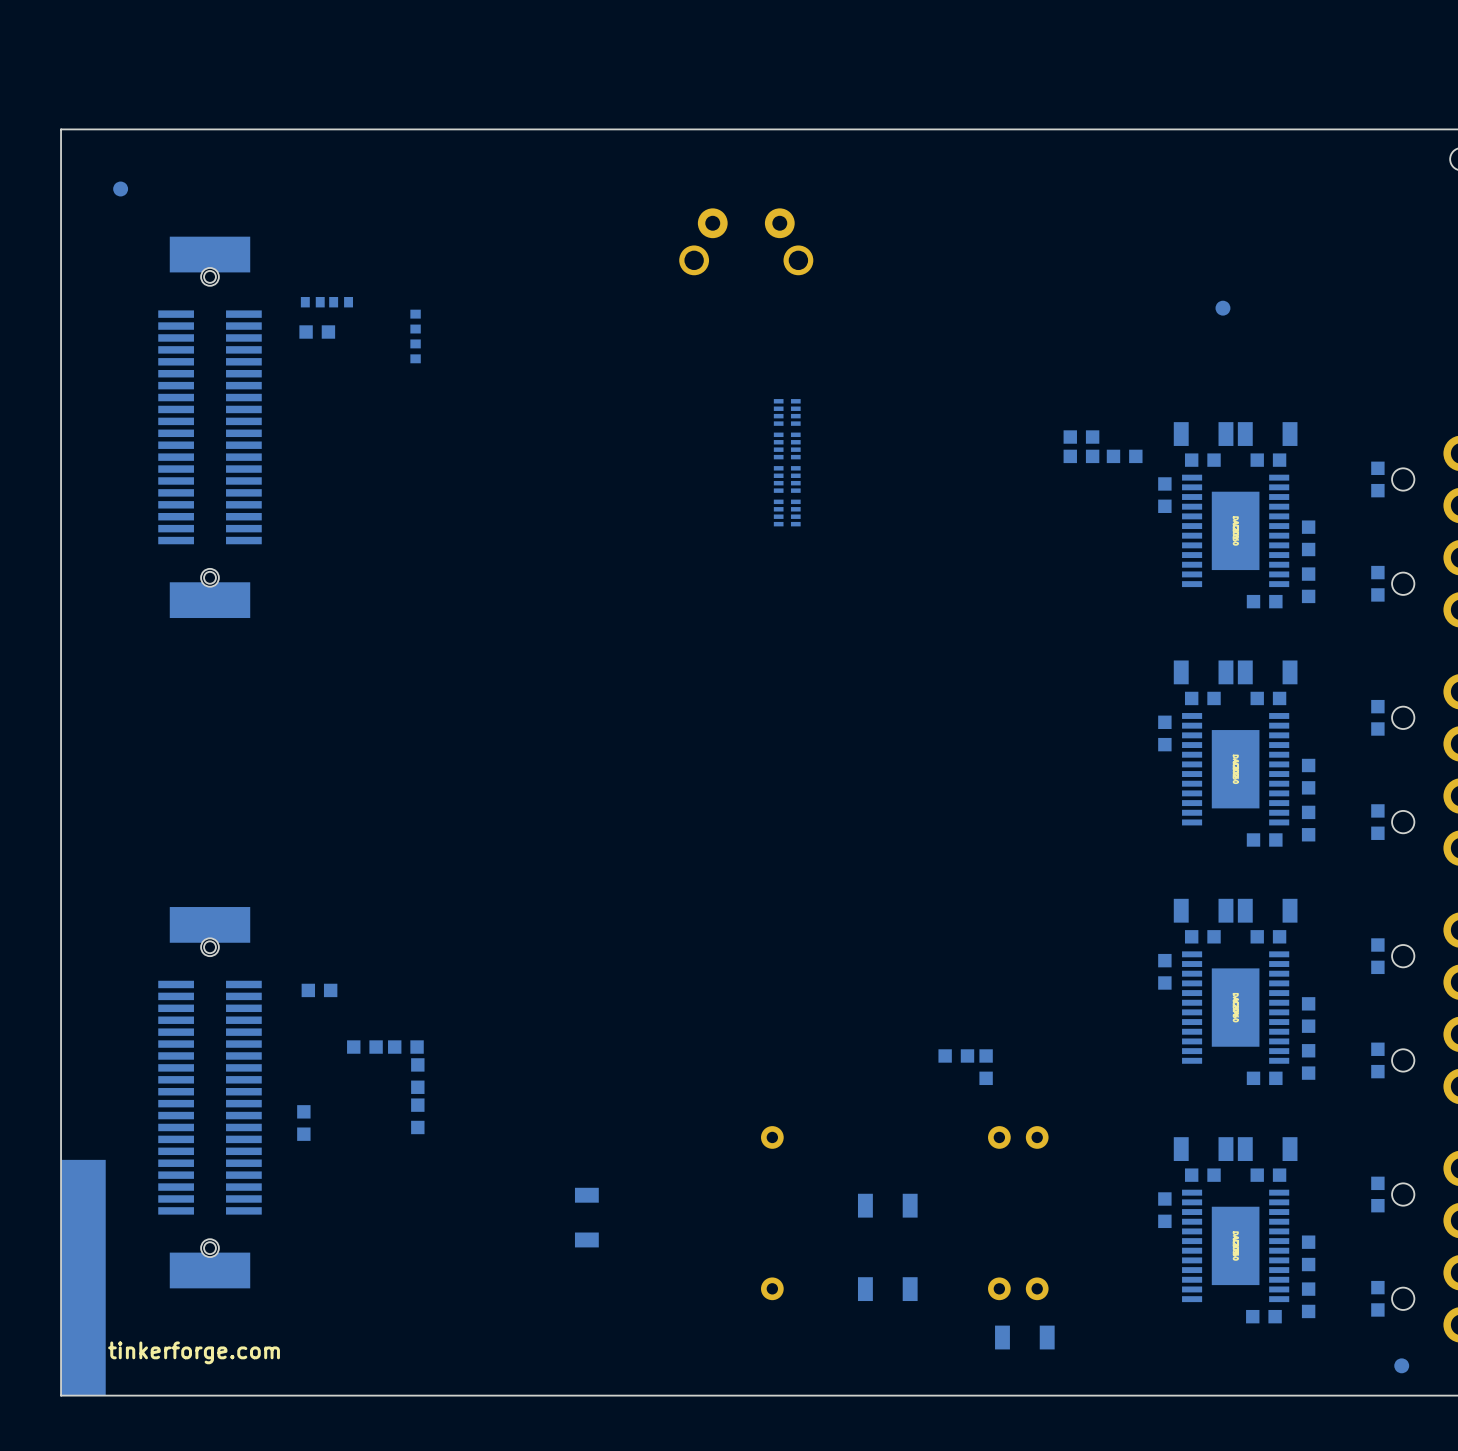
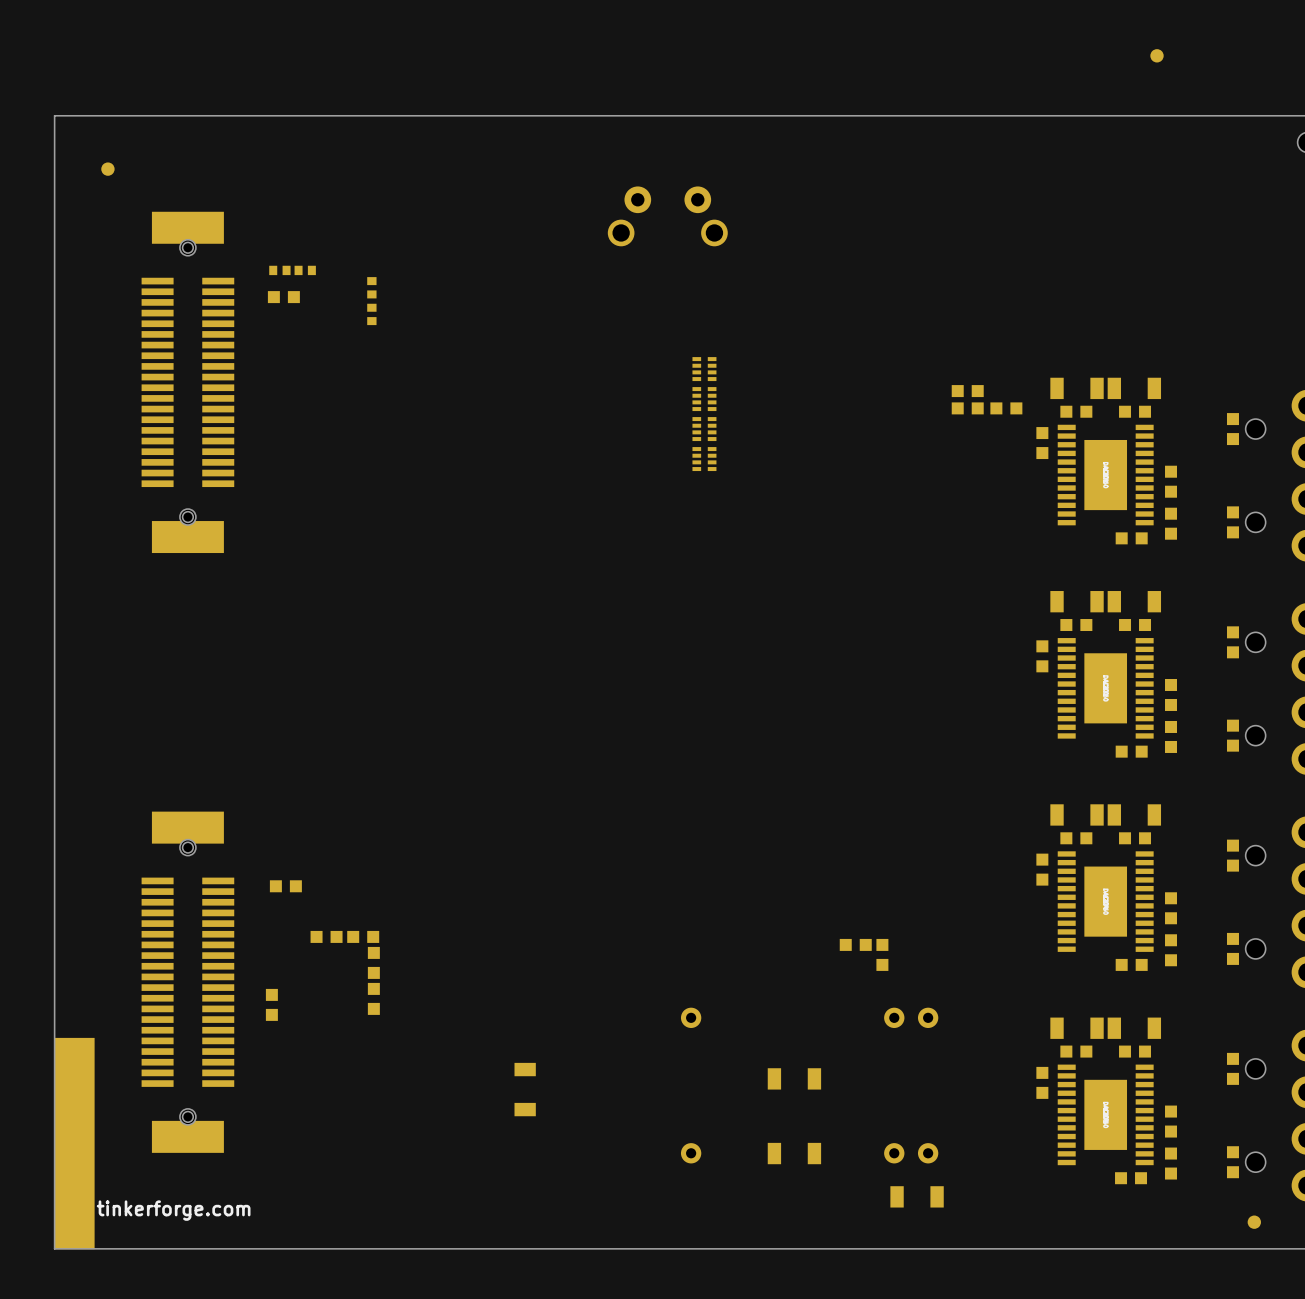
part position: (1222, 308) -> (1157, 55)

